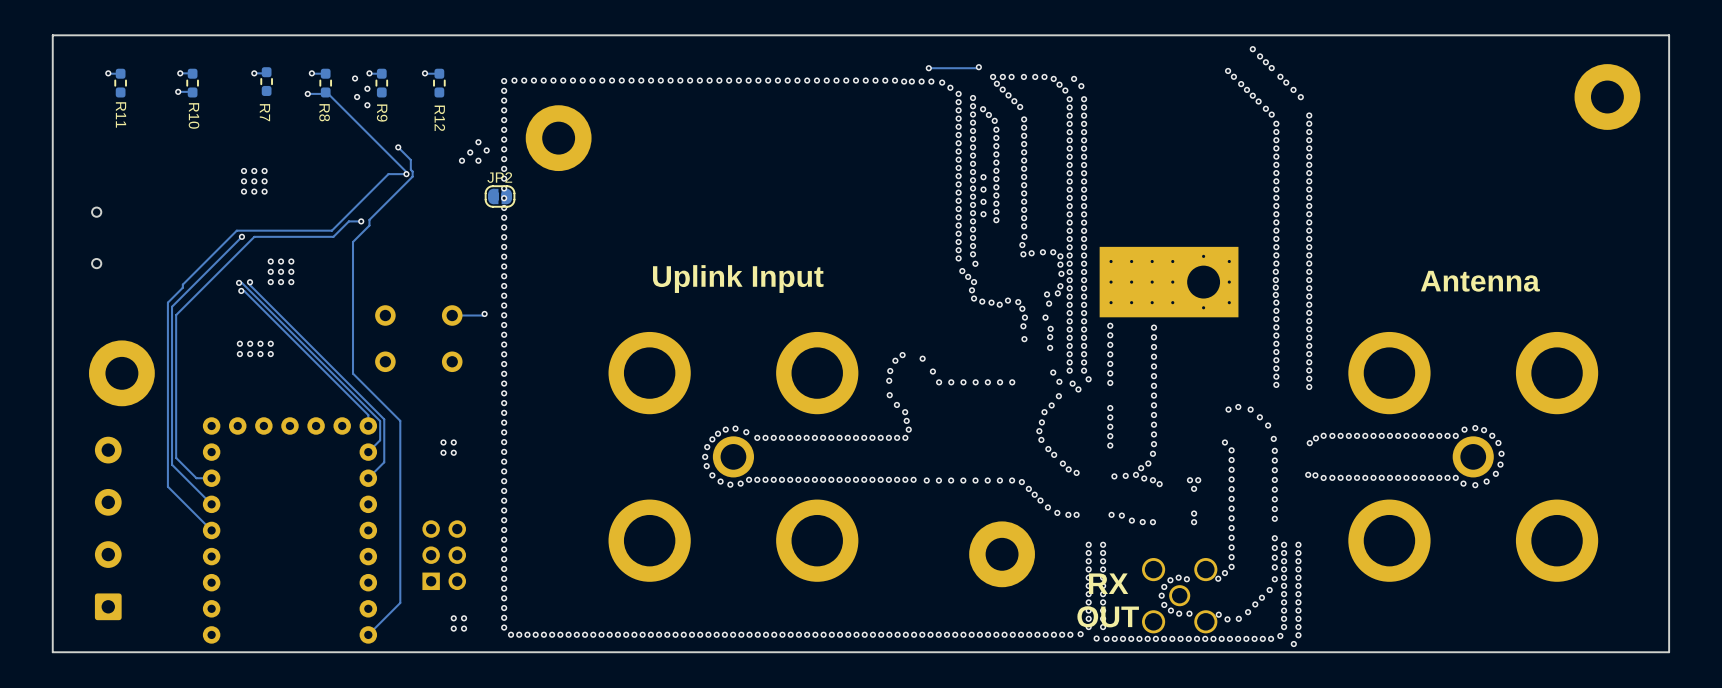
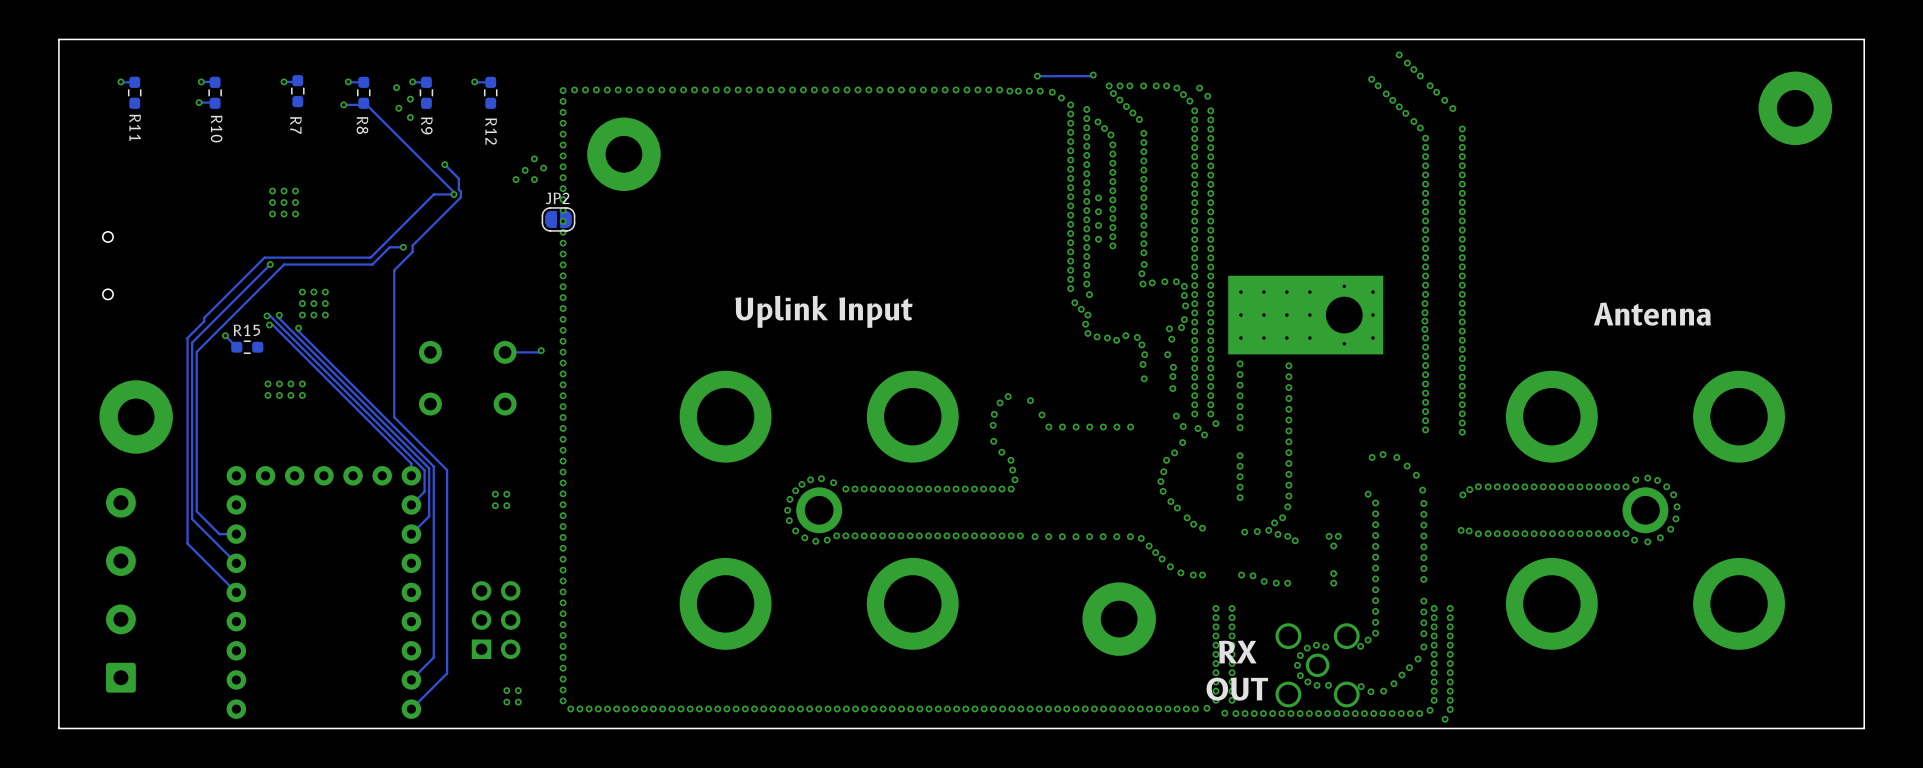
track: none -> (298, 328) (298, 331) (433, 466) (433, 657) (411, 679)
via: none -> (298, 328)
track: none -> (225, 335) (236, 347)
via: none -> (225, 335)
R15: none -> (247, 347)

